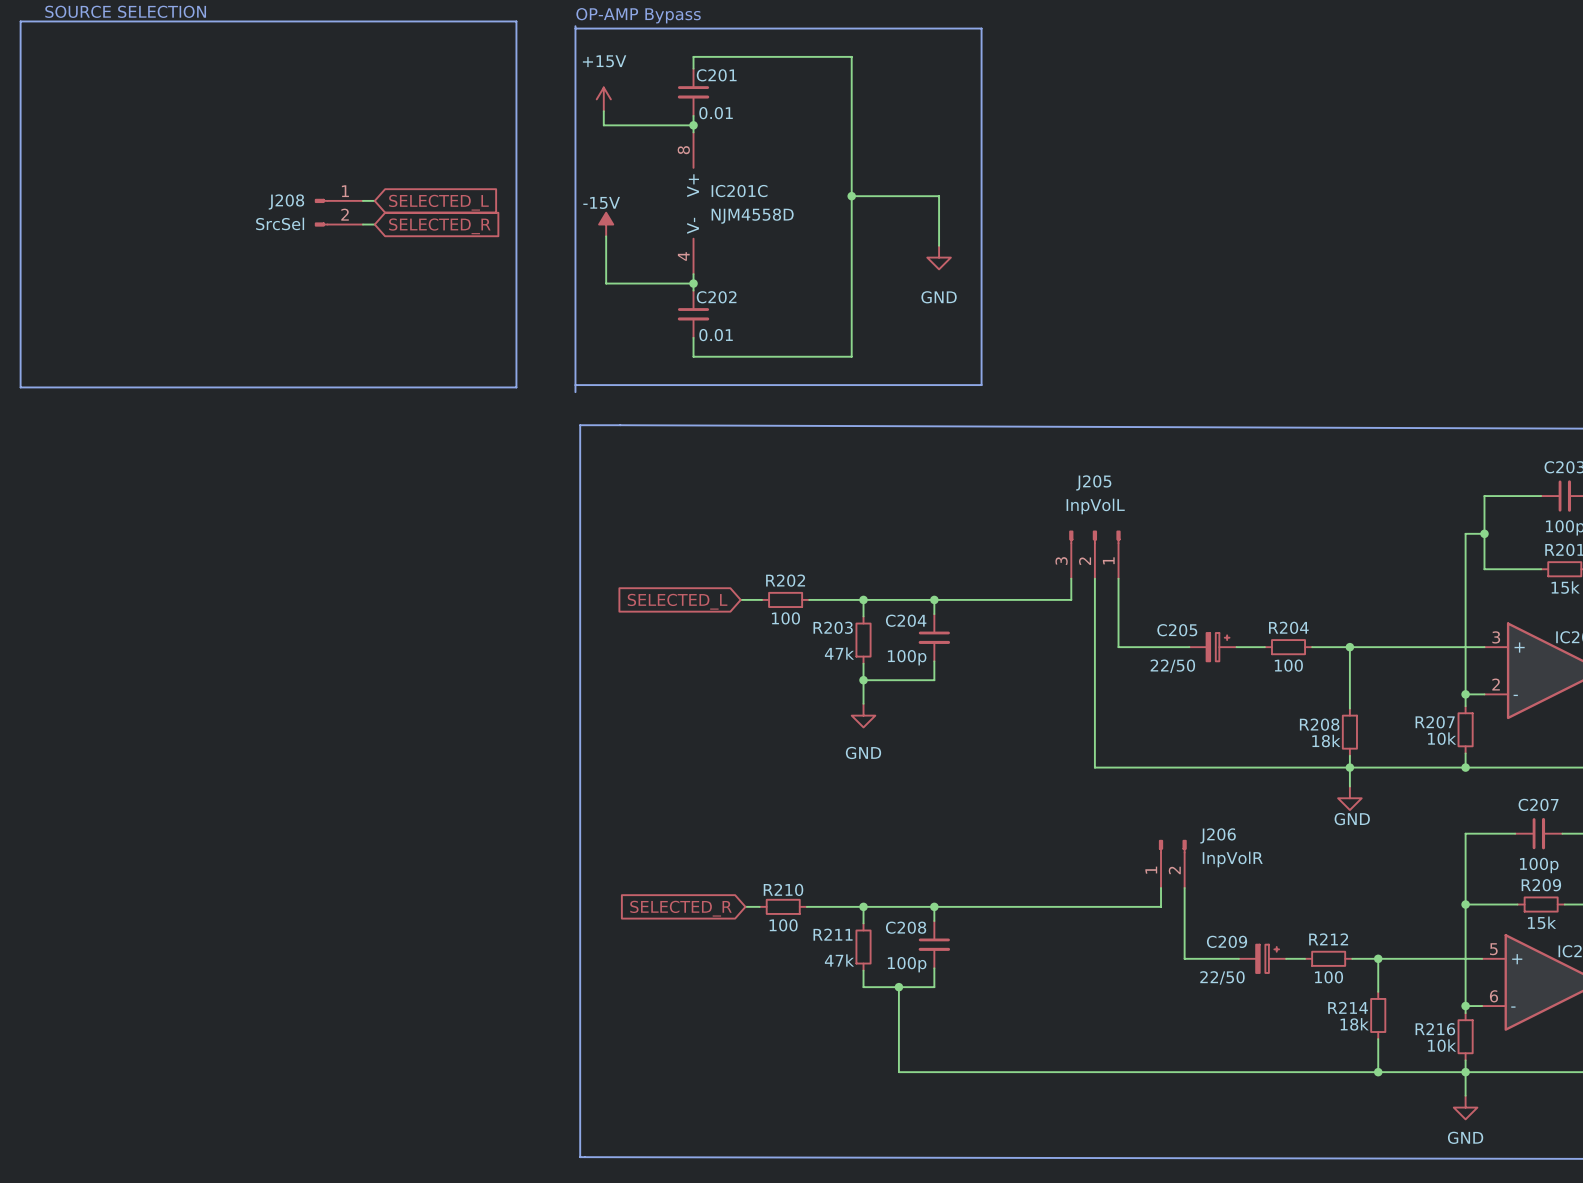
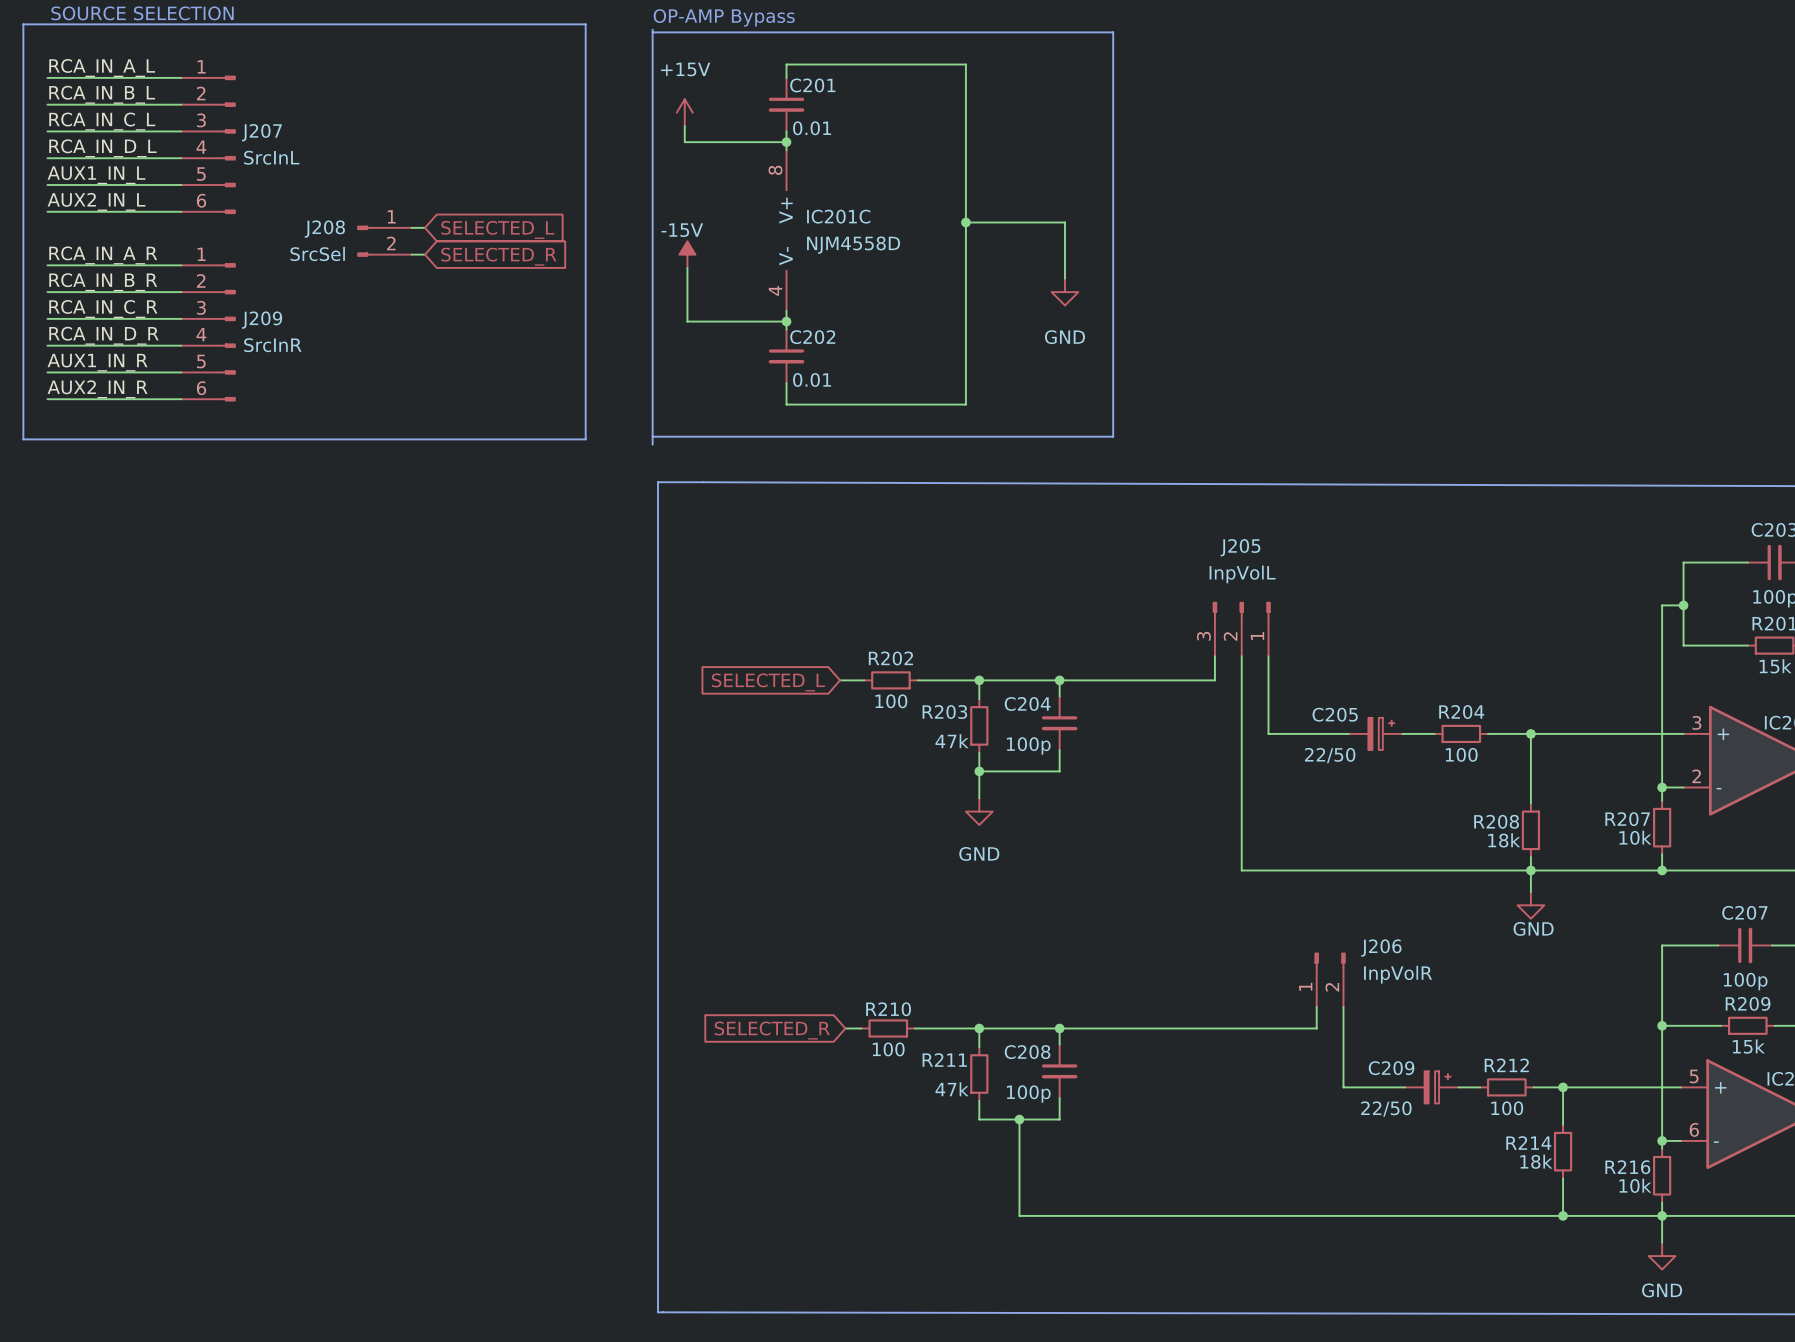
label: none -> RCA_IN_A_L (102, 68)
wire: none -> (47, 77) (181, 77)
label: none -> RCA_IN_B_L (102, 94)
wire: none -> (47, 104) (181, 104)
label: none -> RCA_IN_C_L (102, 121)
wire: none -> (47, 131) (181, 131)
J207: none -> SrcInL (208, 144)
label: none -> RCA_IN_D_L (102, 148)
wire: none -> (47, 158) (181, 158)
label: none -> AUX1_IN_L (96, 175)
wire: none -> (47, 185) (181, 185)
label: none -> AUX2_IN_L (96, 201)
wire: none -> (47, 211) (181, 211)
label: none -> RCA_IN_A_R (103, 255)
wire: none -> (47, 265) (181, 265)
label: none -> RCA_IN_B_R (103, 282)
wire: none -> (47, 292) (181, 292)
label: none -> RCA_IN_C_R (103, 308)
wire: none -> (47, 318) (181, 318)
J209: none -> SrcInR (208, 332)
label: none -> RCA_IN_D_R (103, 335)
wire: none -> (47, 345) (181, 345)
label: none -> AUX1_IN_R (97, 362)
wire: none -> (47, 372) (181, 372)
label: none -> AUX2_IN_R (97, 389)
wire: none -> (47, 399) (181, 399)

